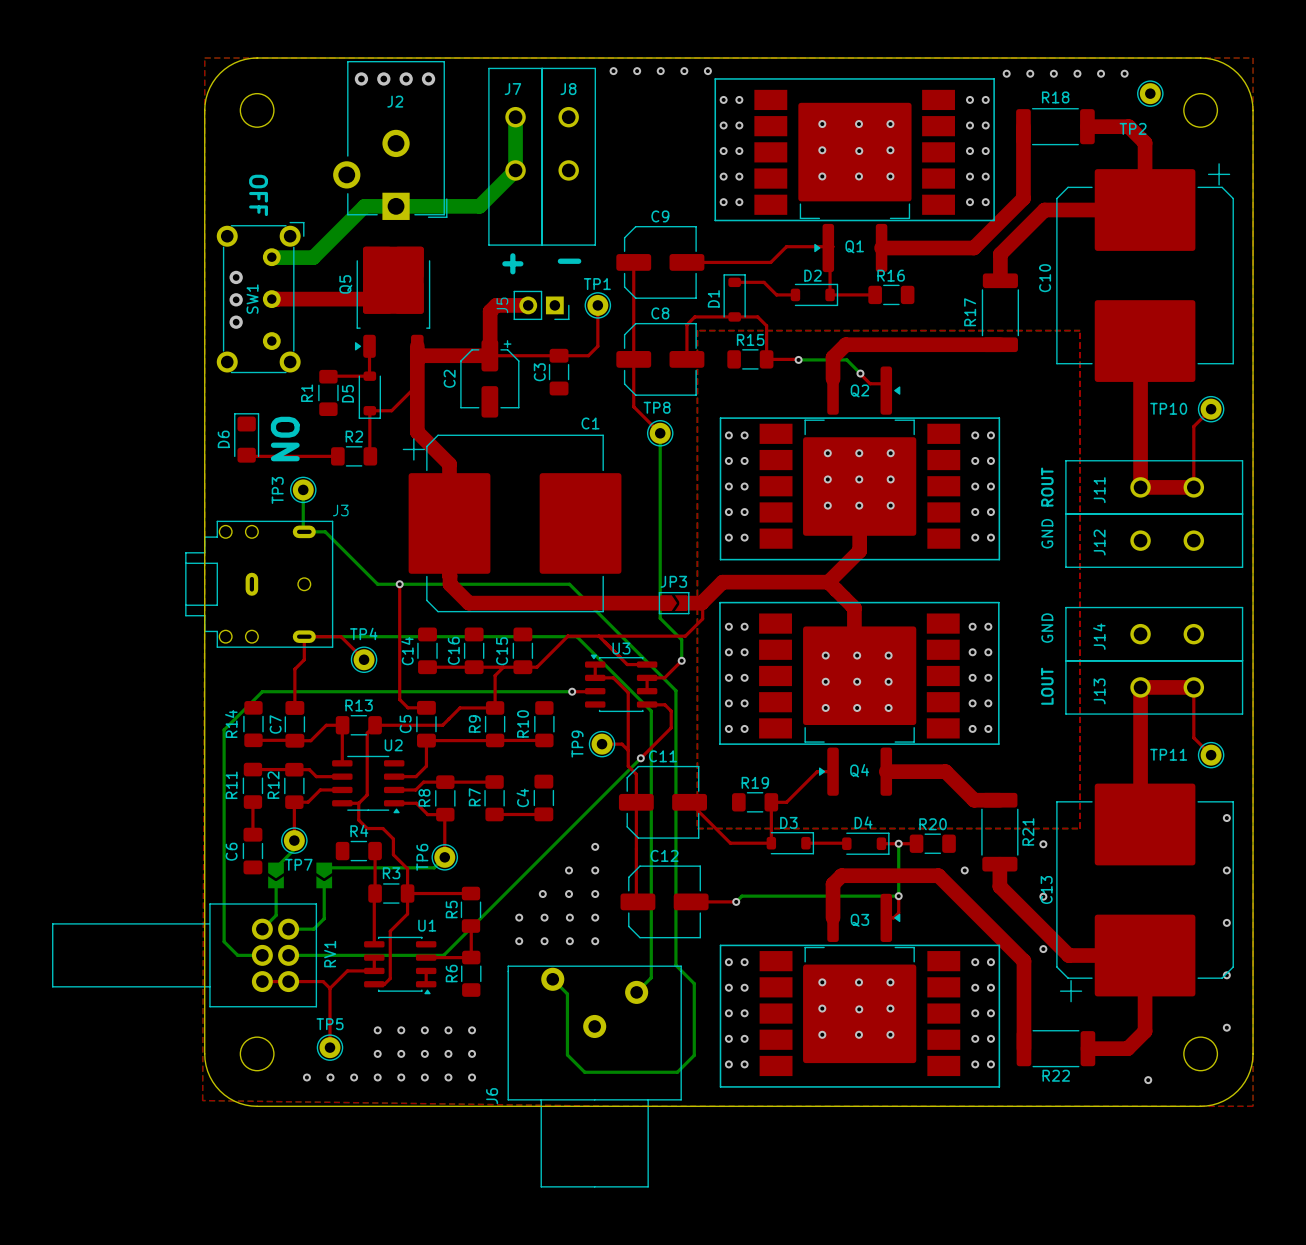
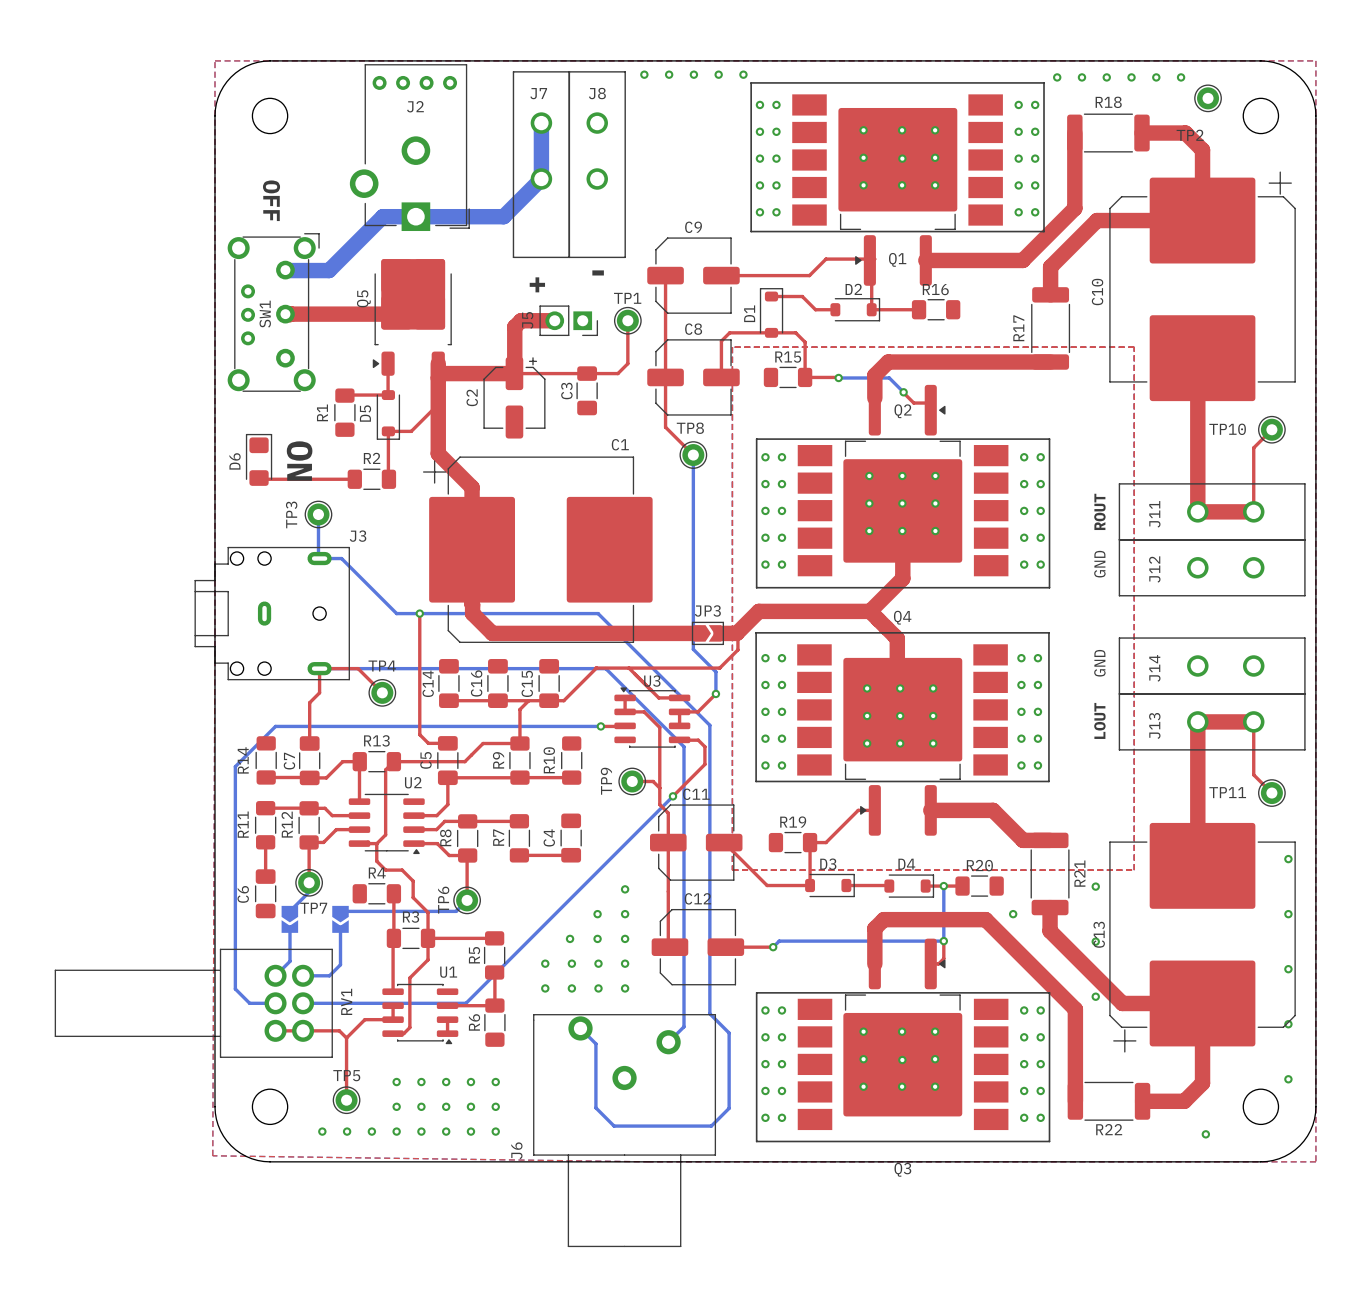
Q4 name position: Q4 (859, 770) -> Q4 (902, 617)
Q3 name position: Q3 (859, 920) -> Q3 (902, 1169)

